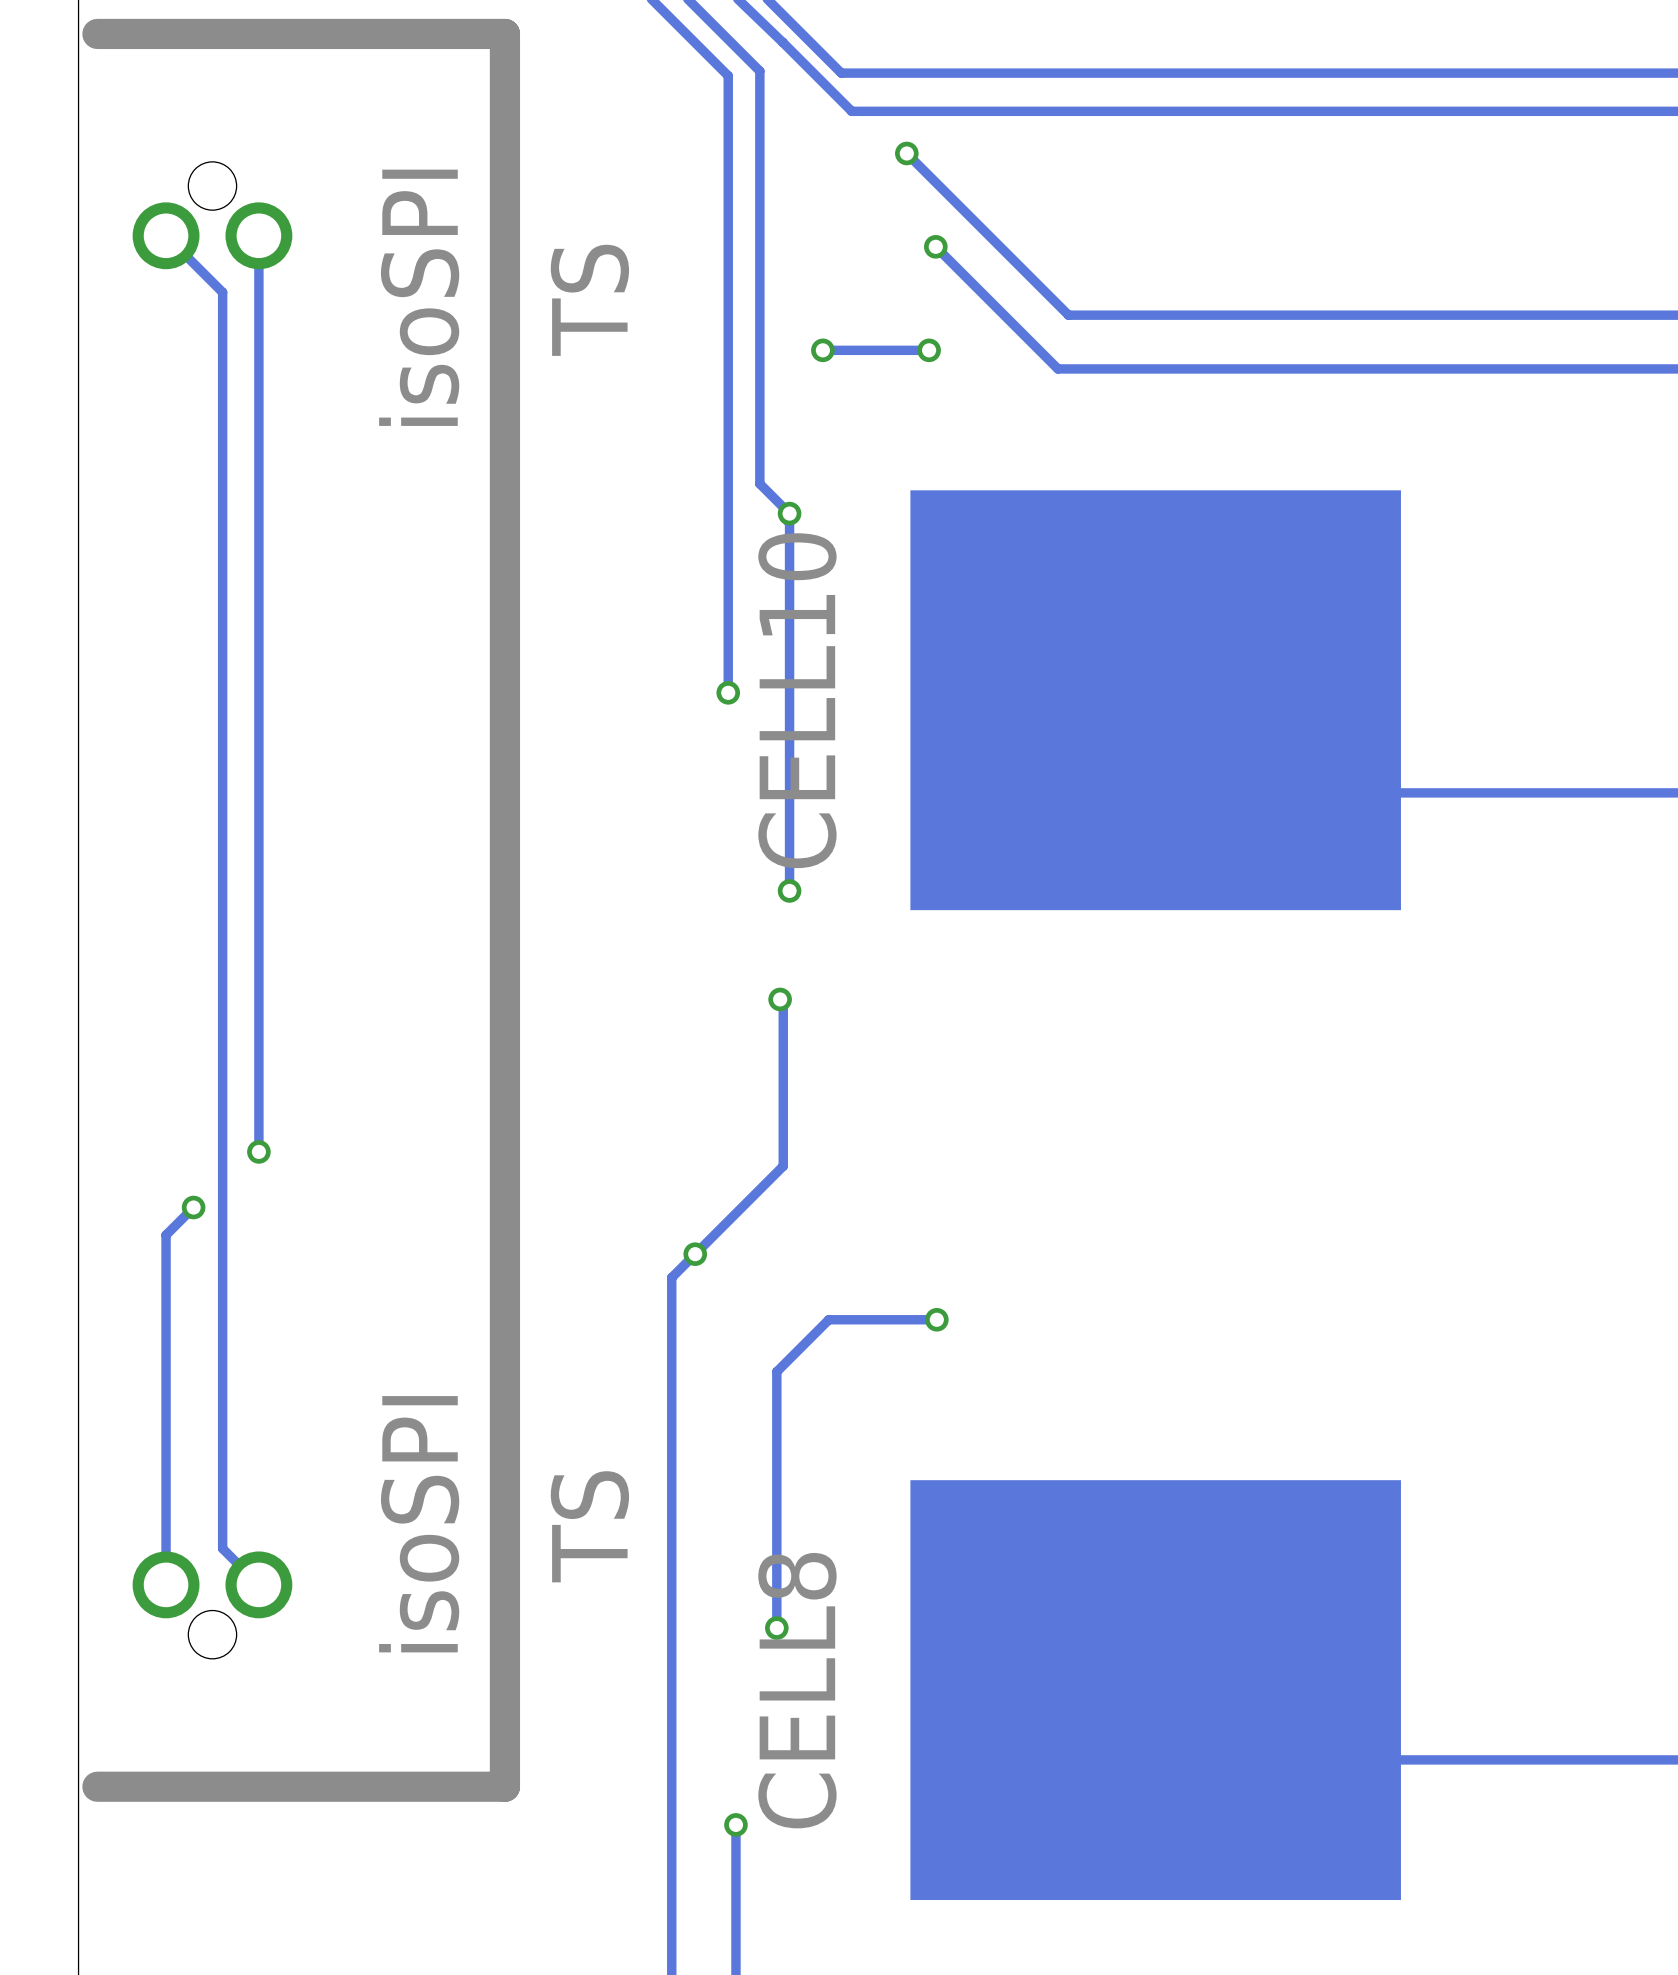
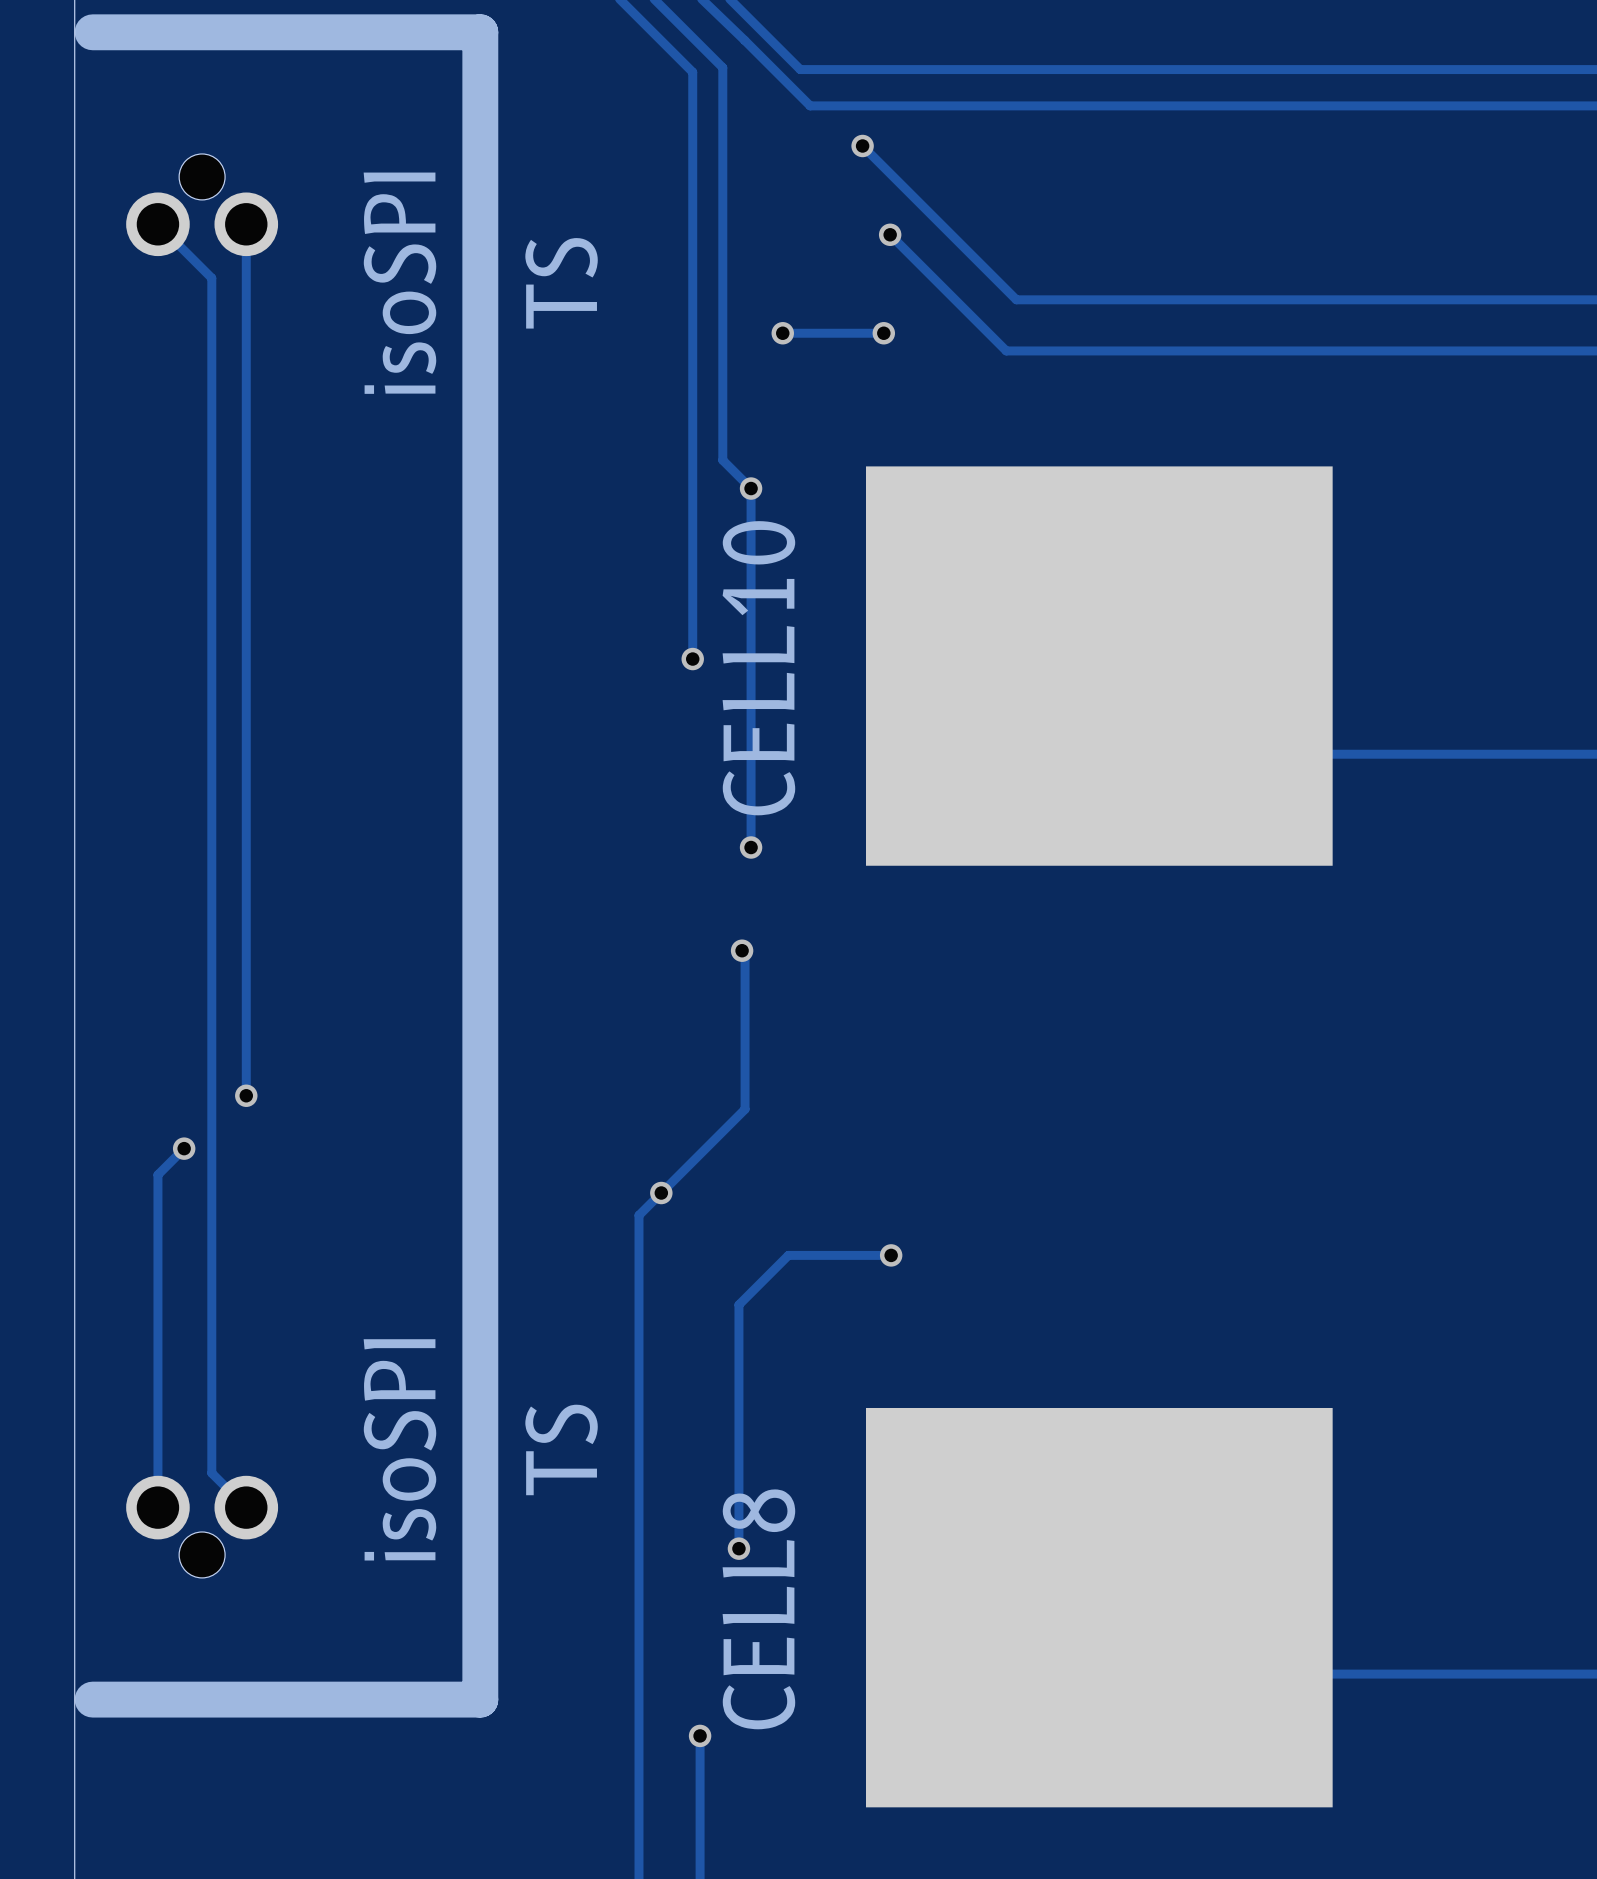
line width: thin (97, 33) (504, 33) (504, 1786) (97, 1786) -> thick (92, 32) (480, 32) (480, 1699) (92, 1699)

